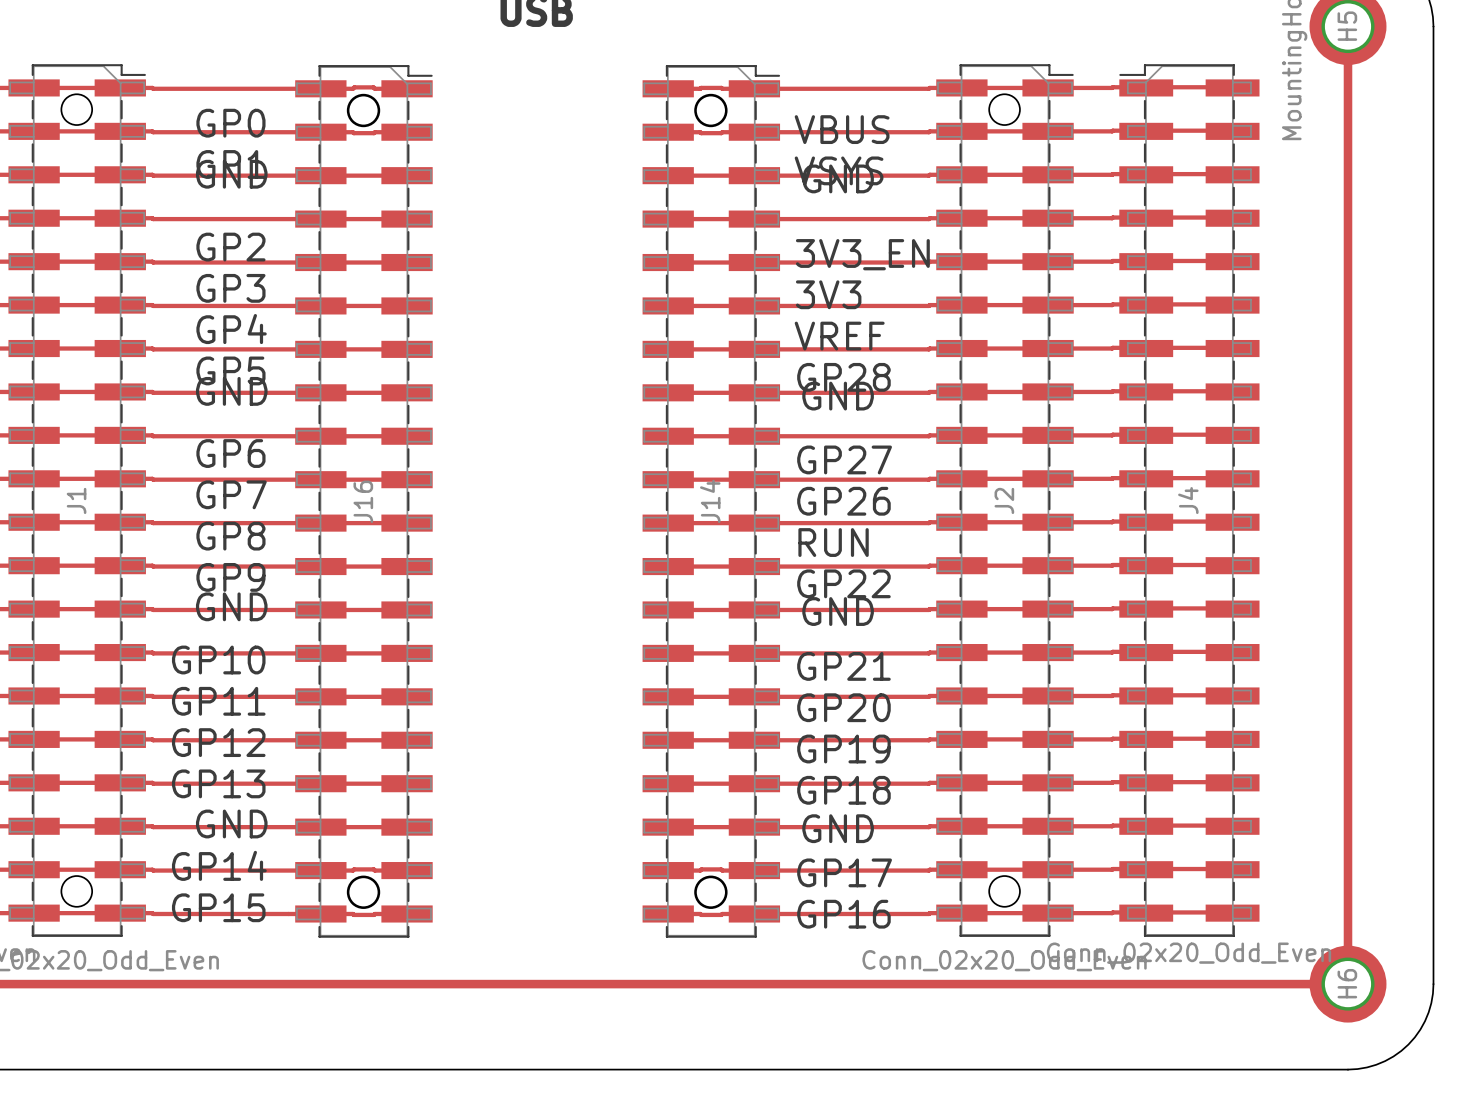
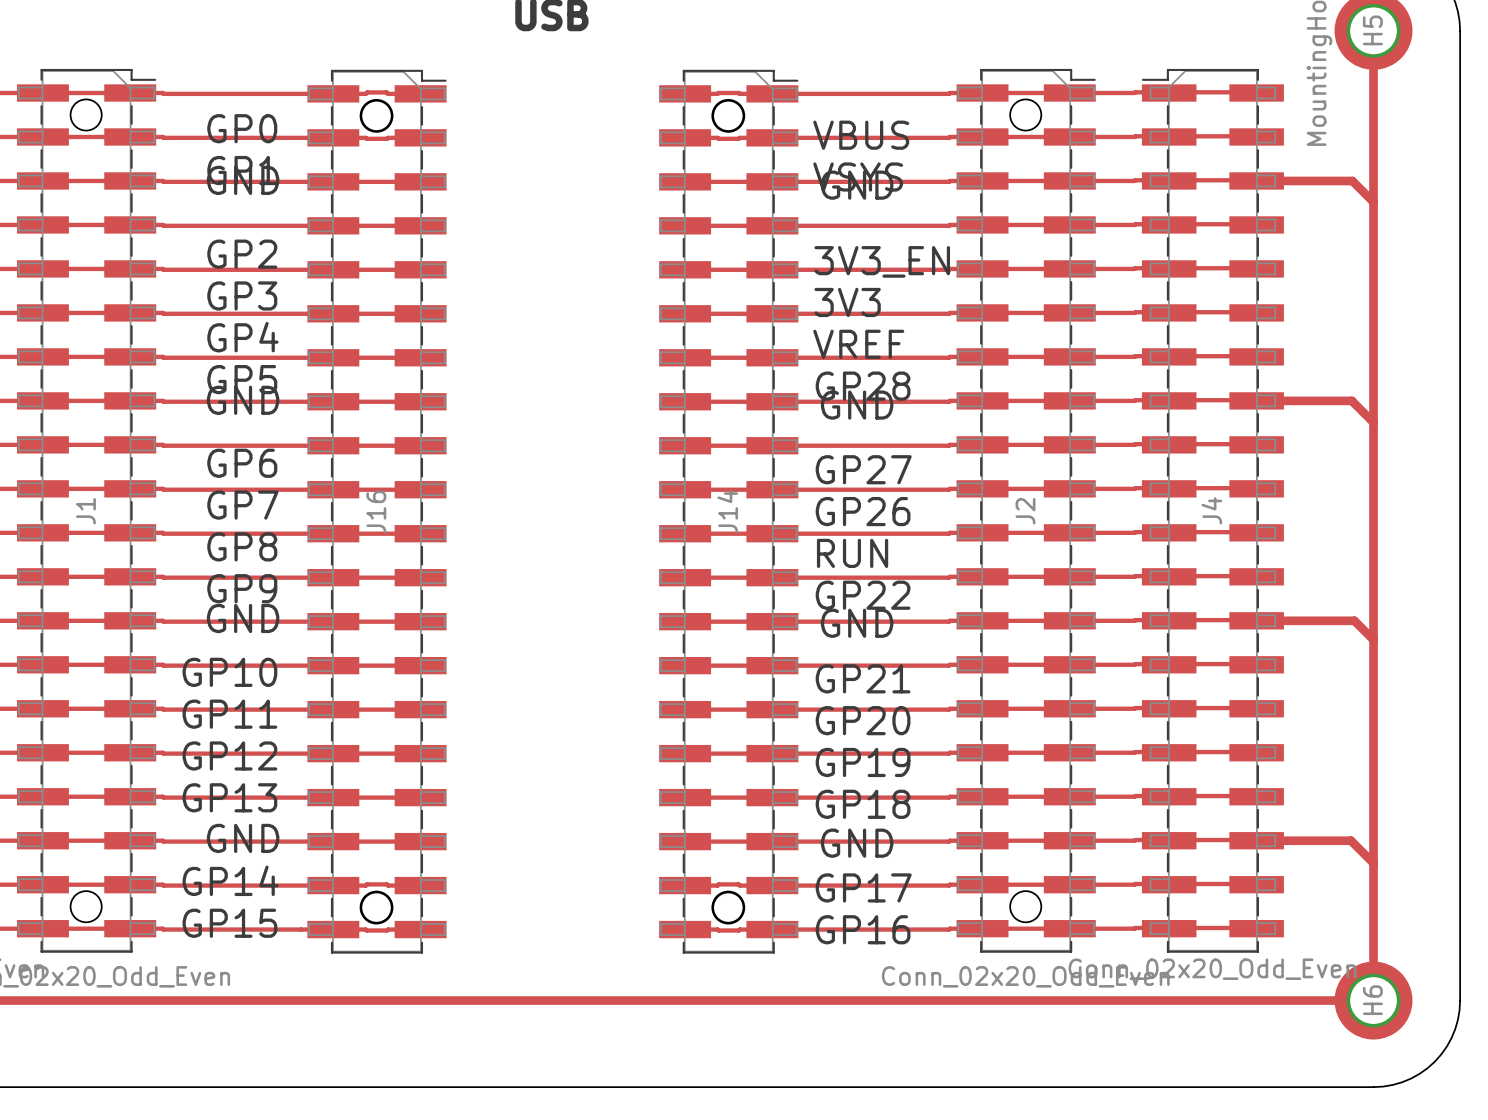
track: none -> (1256, 180) (1352, 180) (1373, 202)
track: none -> (1256, 400) (1351, 400) (1373, 422)
track: none -> (1256, 620) (1354, 620) (1373, 639)
track: none -> (1256, 840) (1351, 840) (1373, 863)

